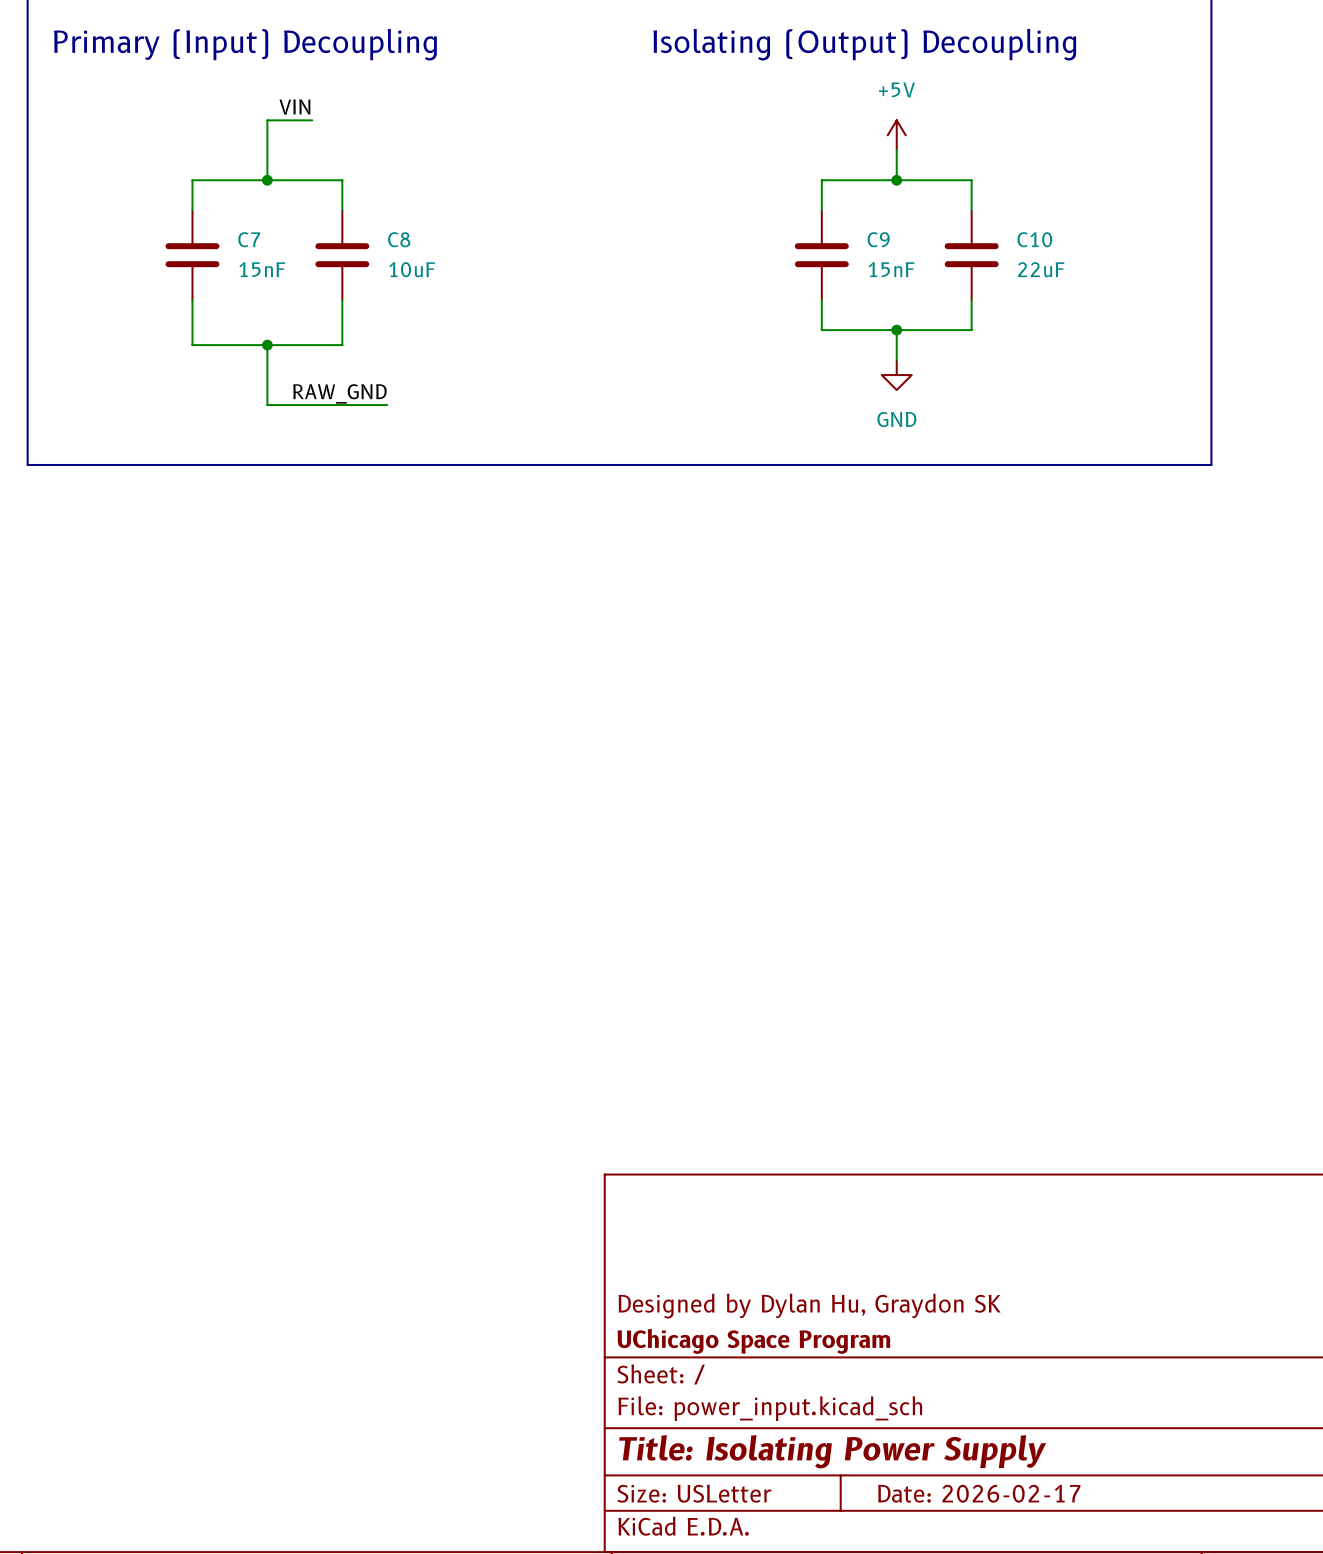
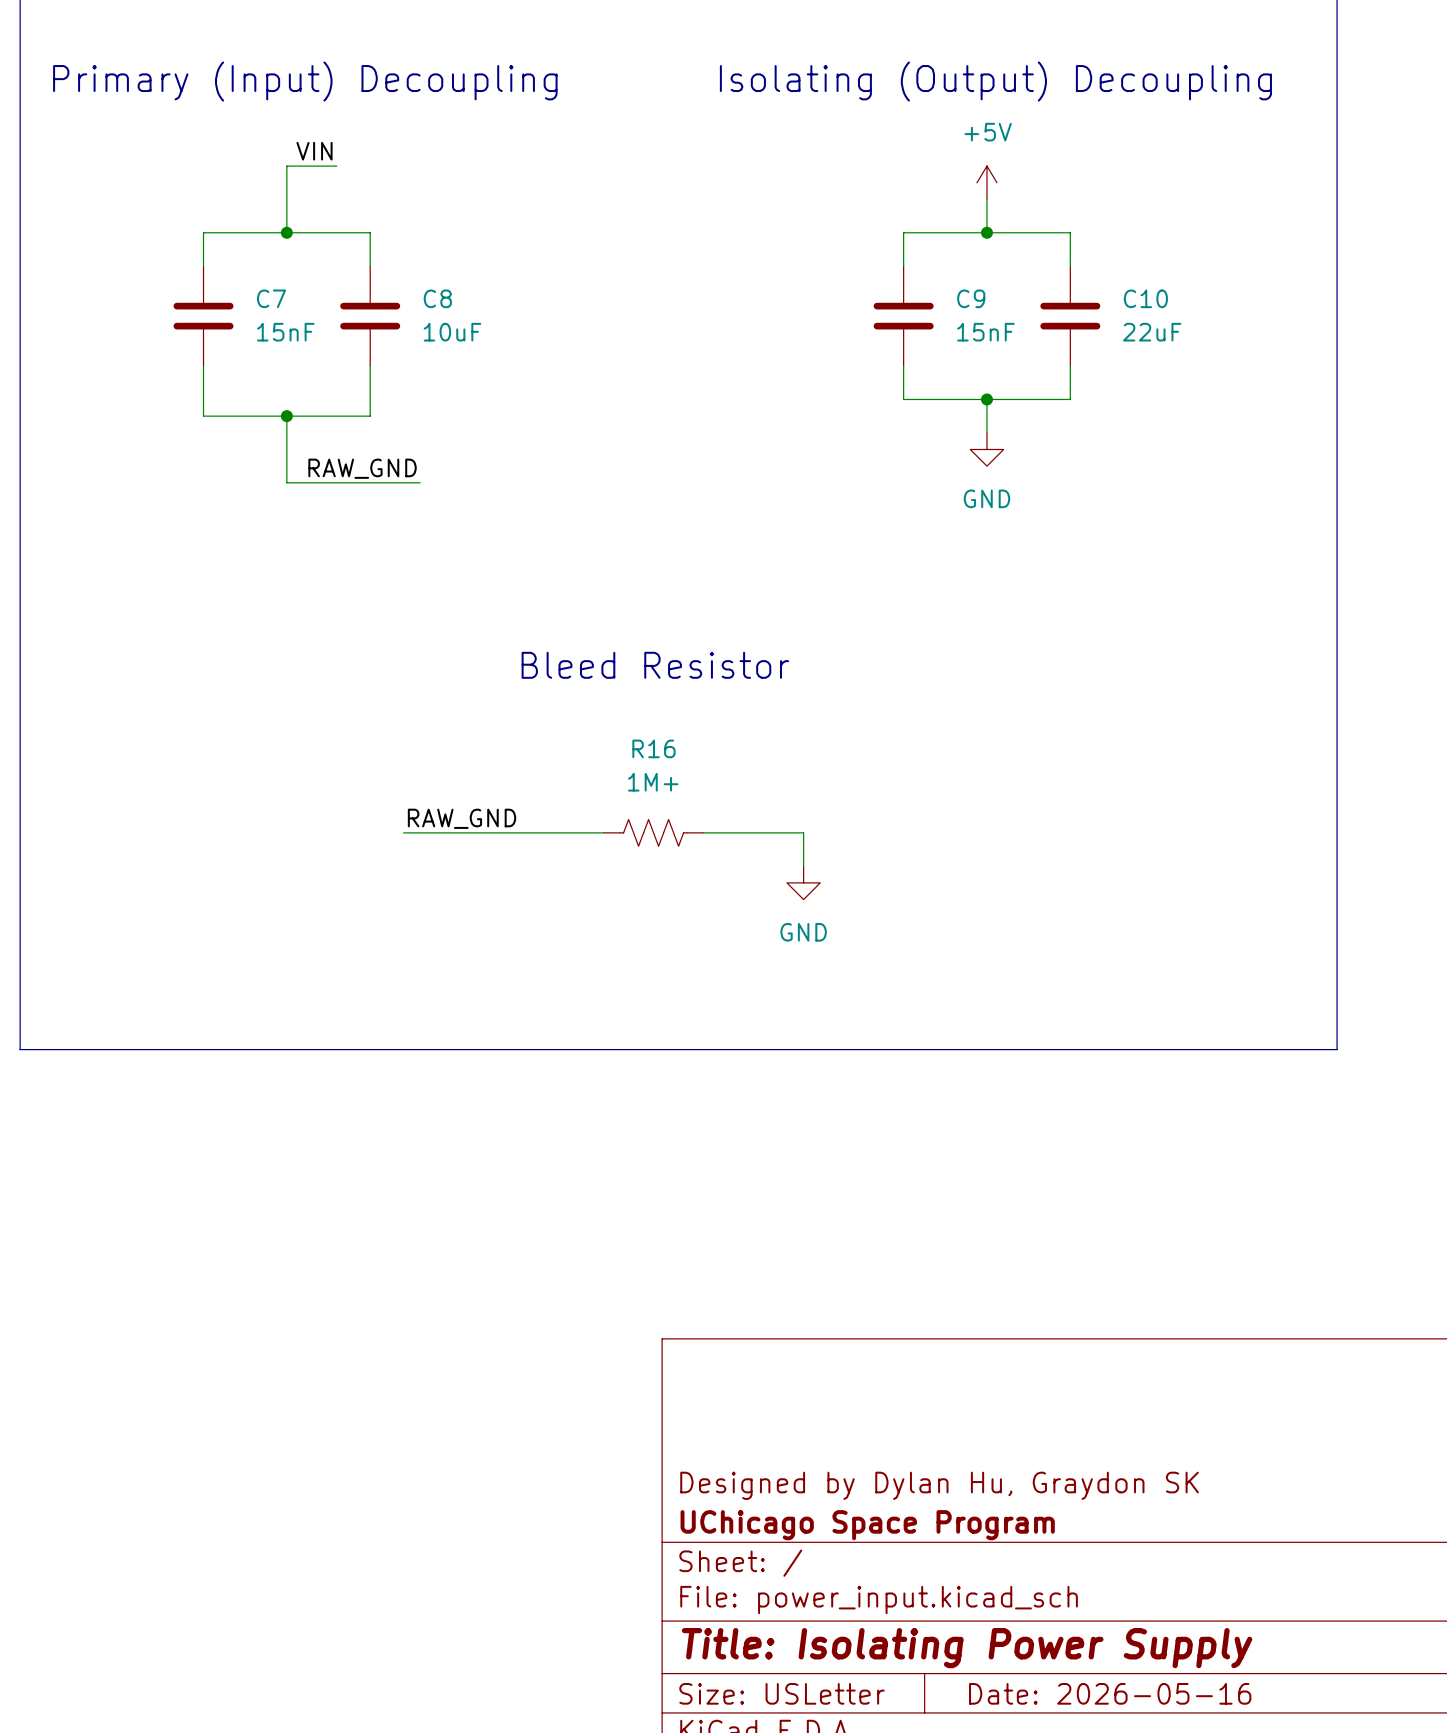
line: (27, 464) (1211, 464) -> (20, 549) (20, 1049) (1337, 1049) (1337, 549)
text: none -> Bleed Resistor (655, 665)
label: none -> RAW_GND (462, 818)
wire: none -> (403, 832) (603, 832)
R16: none -> 1M+ (653, 832)
wire: none -> (703, 832) (803, 832) (803, 866)
power symbol: none -> GND (803, 882)
title block: Date: 2026-02-17 (979, 1493) -> Date: 2026-05-16 (1110, 1693)

